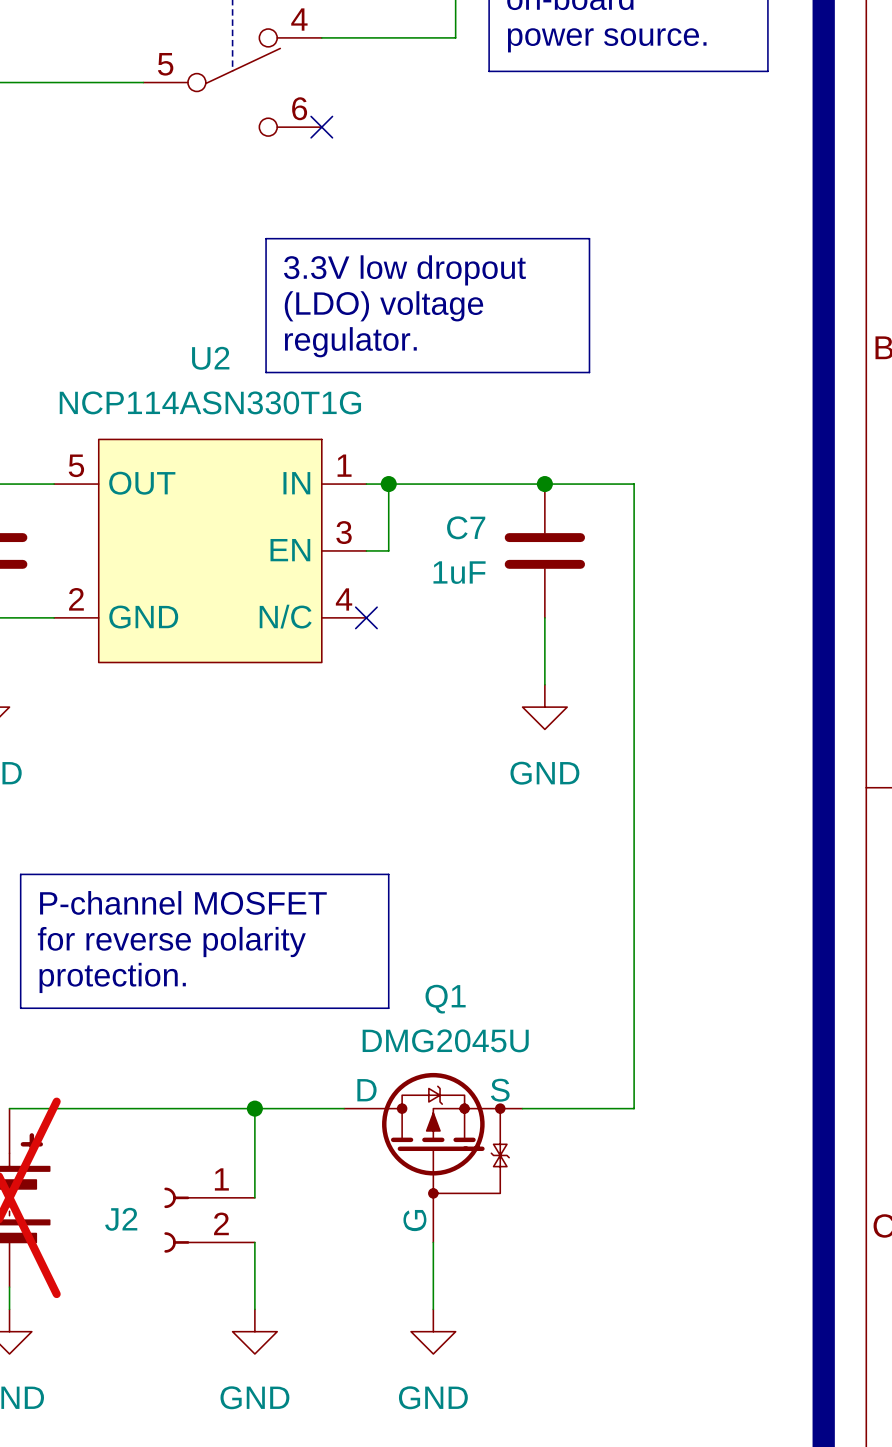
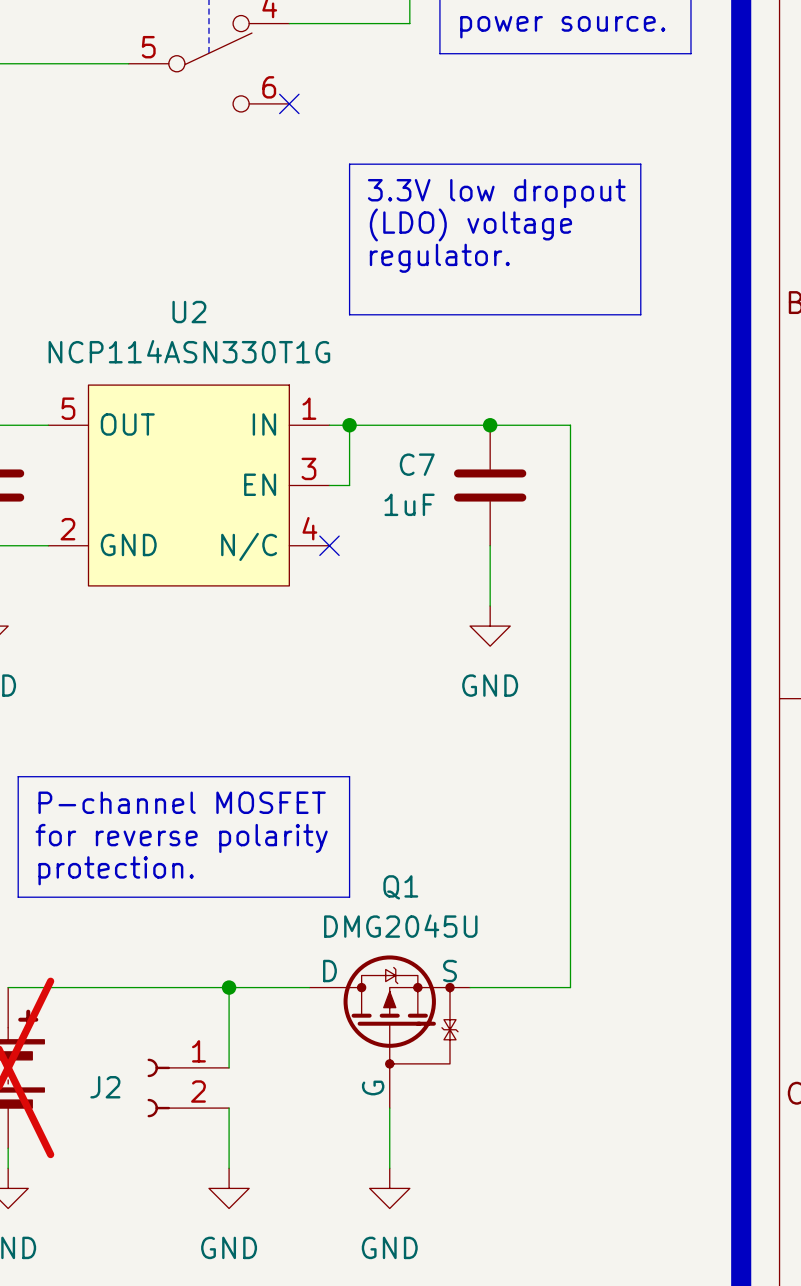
line: none -> (349, 164) (640, 164) (640, 314) (349, 314) (349, 164)
line: (266, 238) (589, 238) (589, 372) (266, 372) (266, 238) -> none
text position: 3.3V low dropout (404, 270) -> 3.3V low dropout (496, 193)
text position: (LDO) voltage (383, 306) -> (LDO) voltage (470, 224)
text position: regulator. (350, 342) -> regulator. (439, 258)

